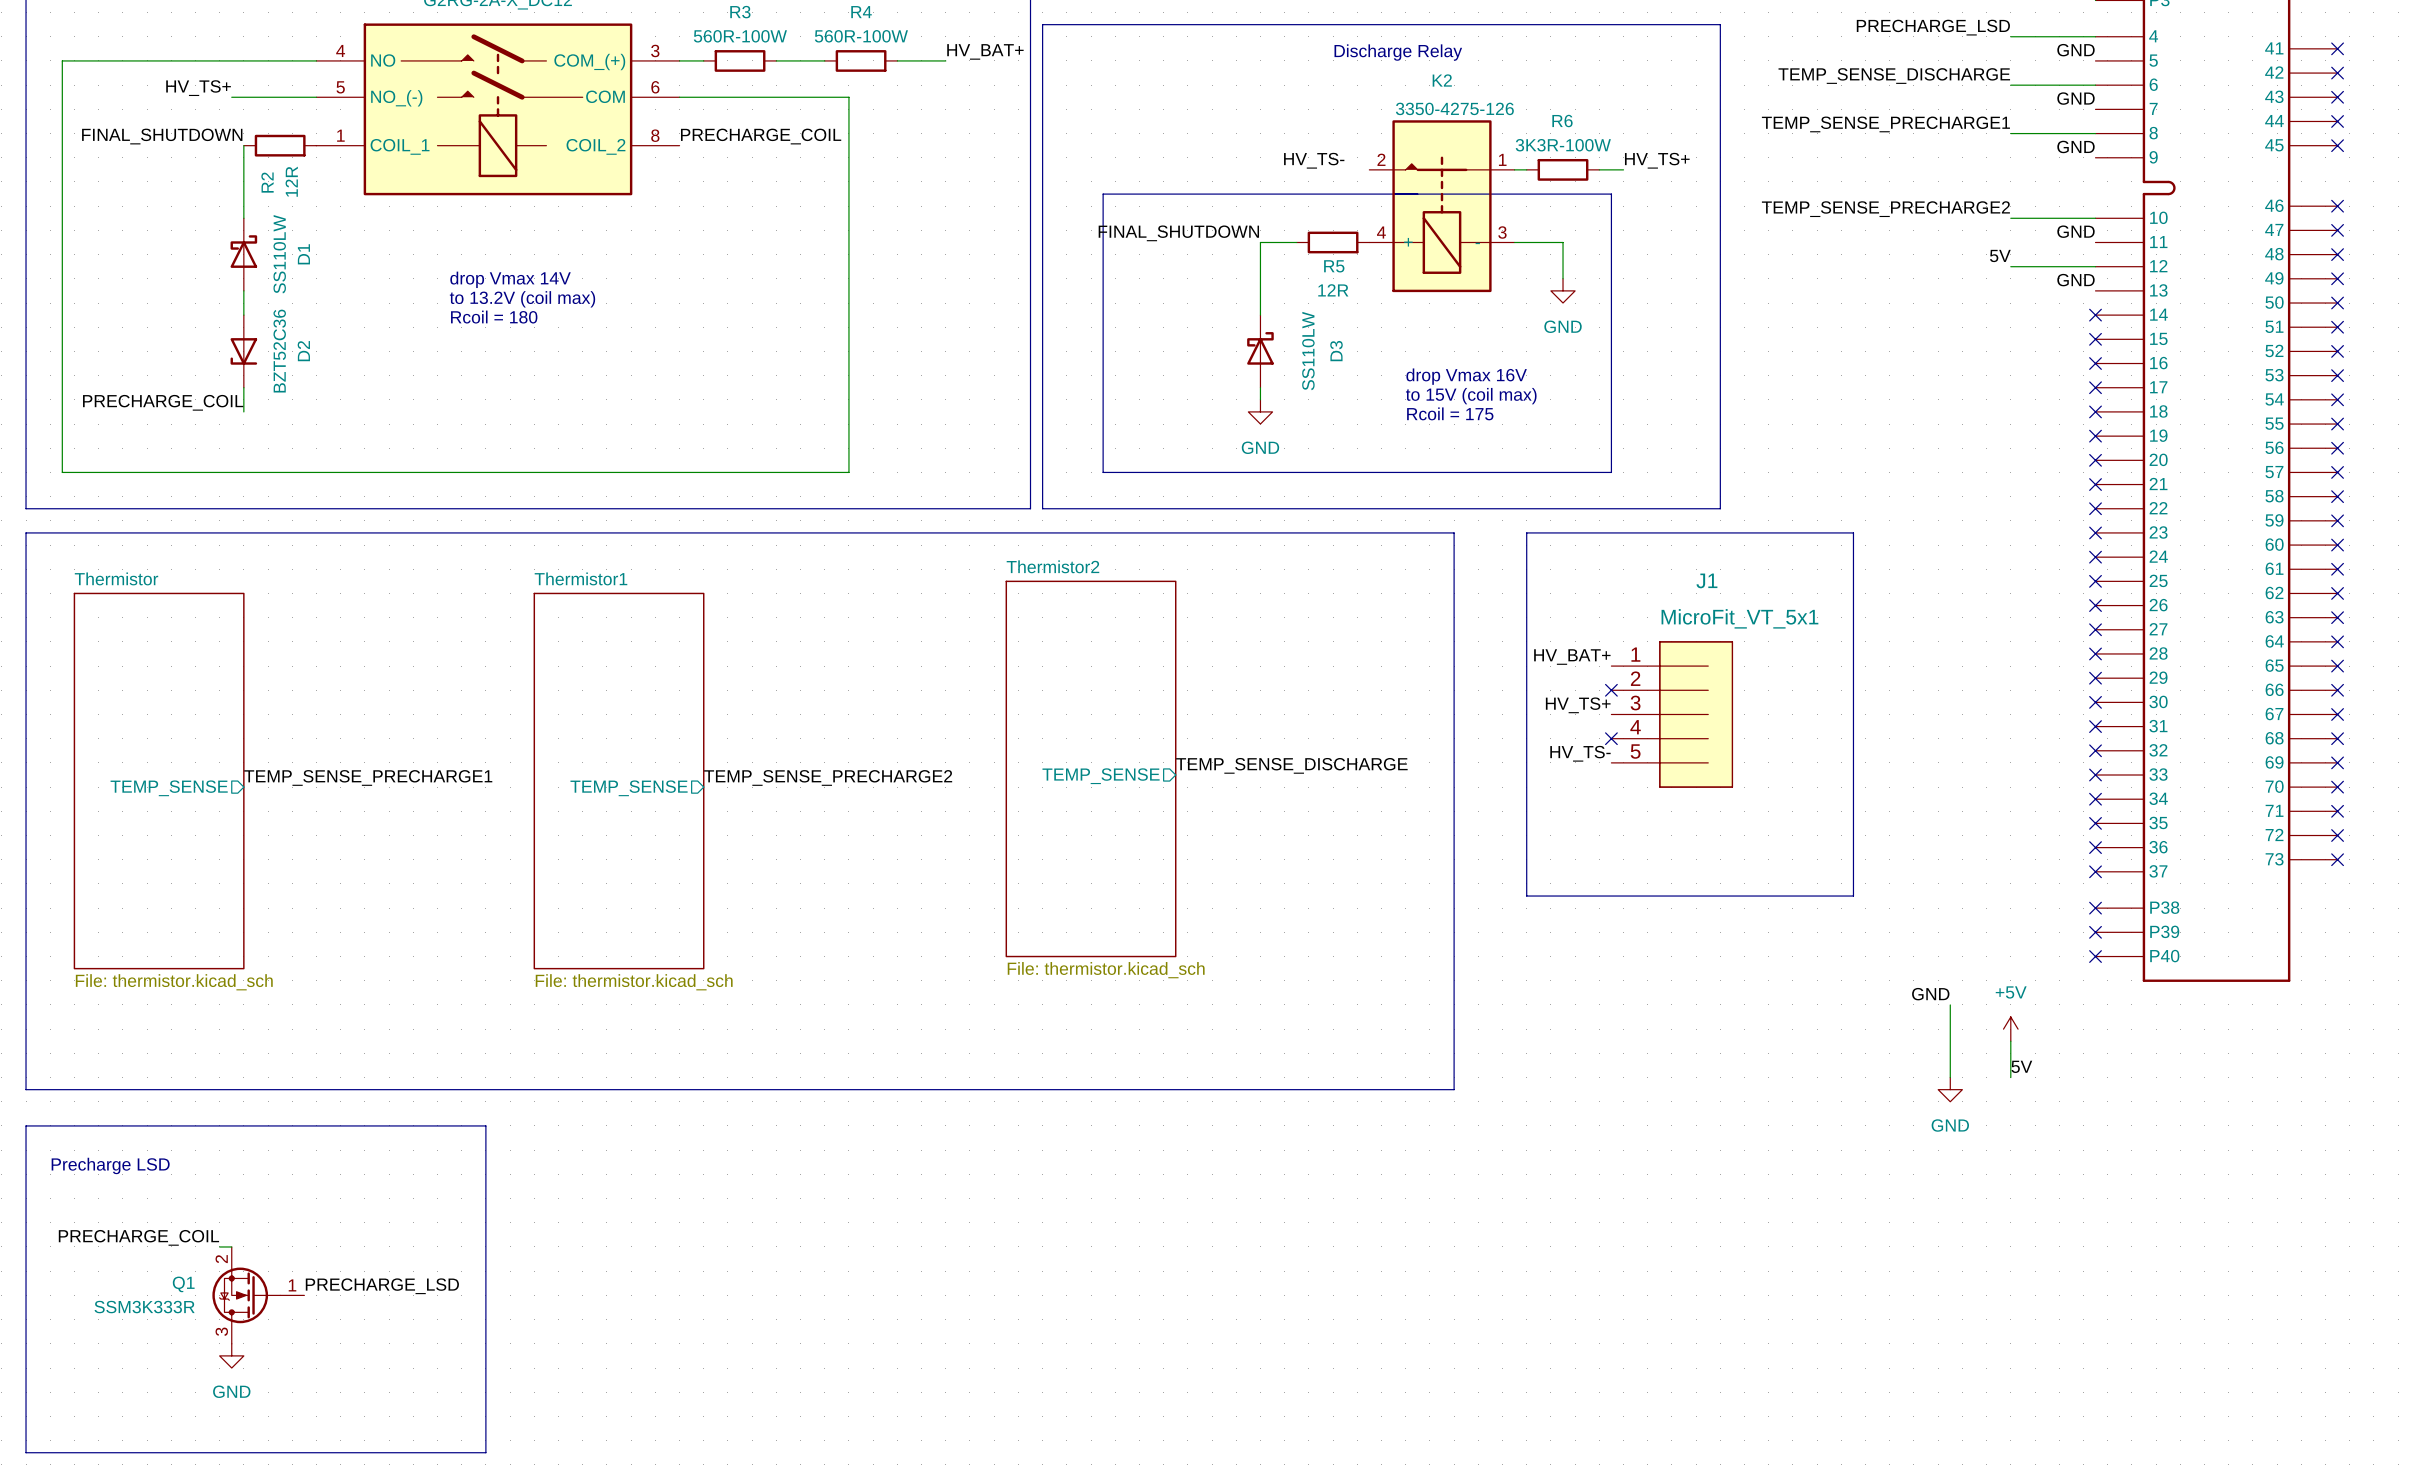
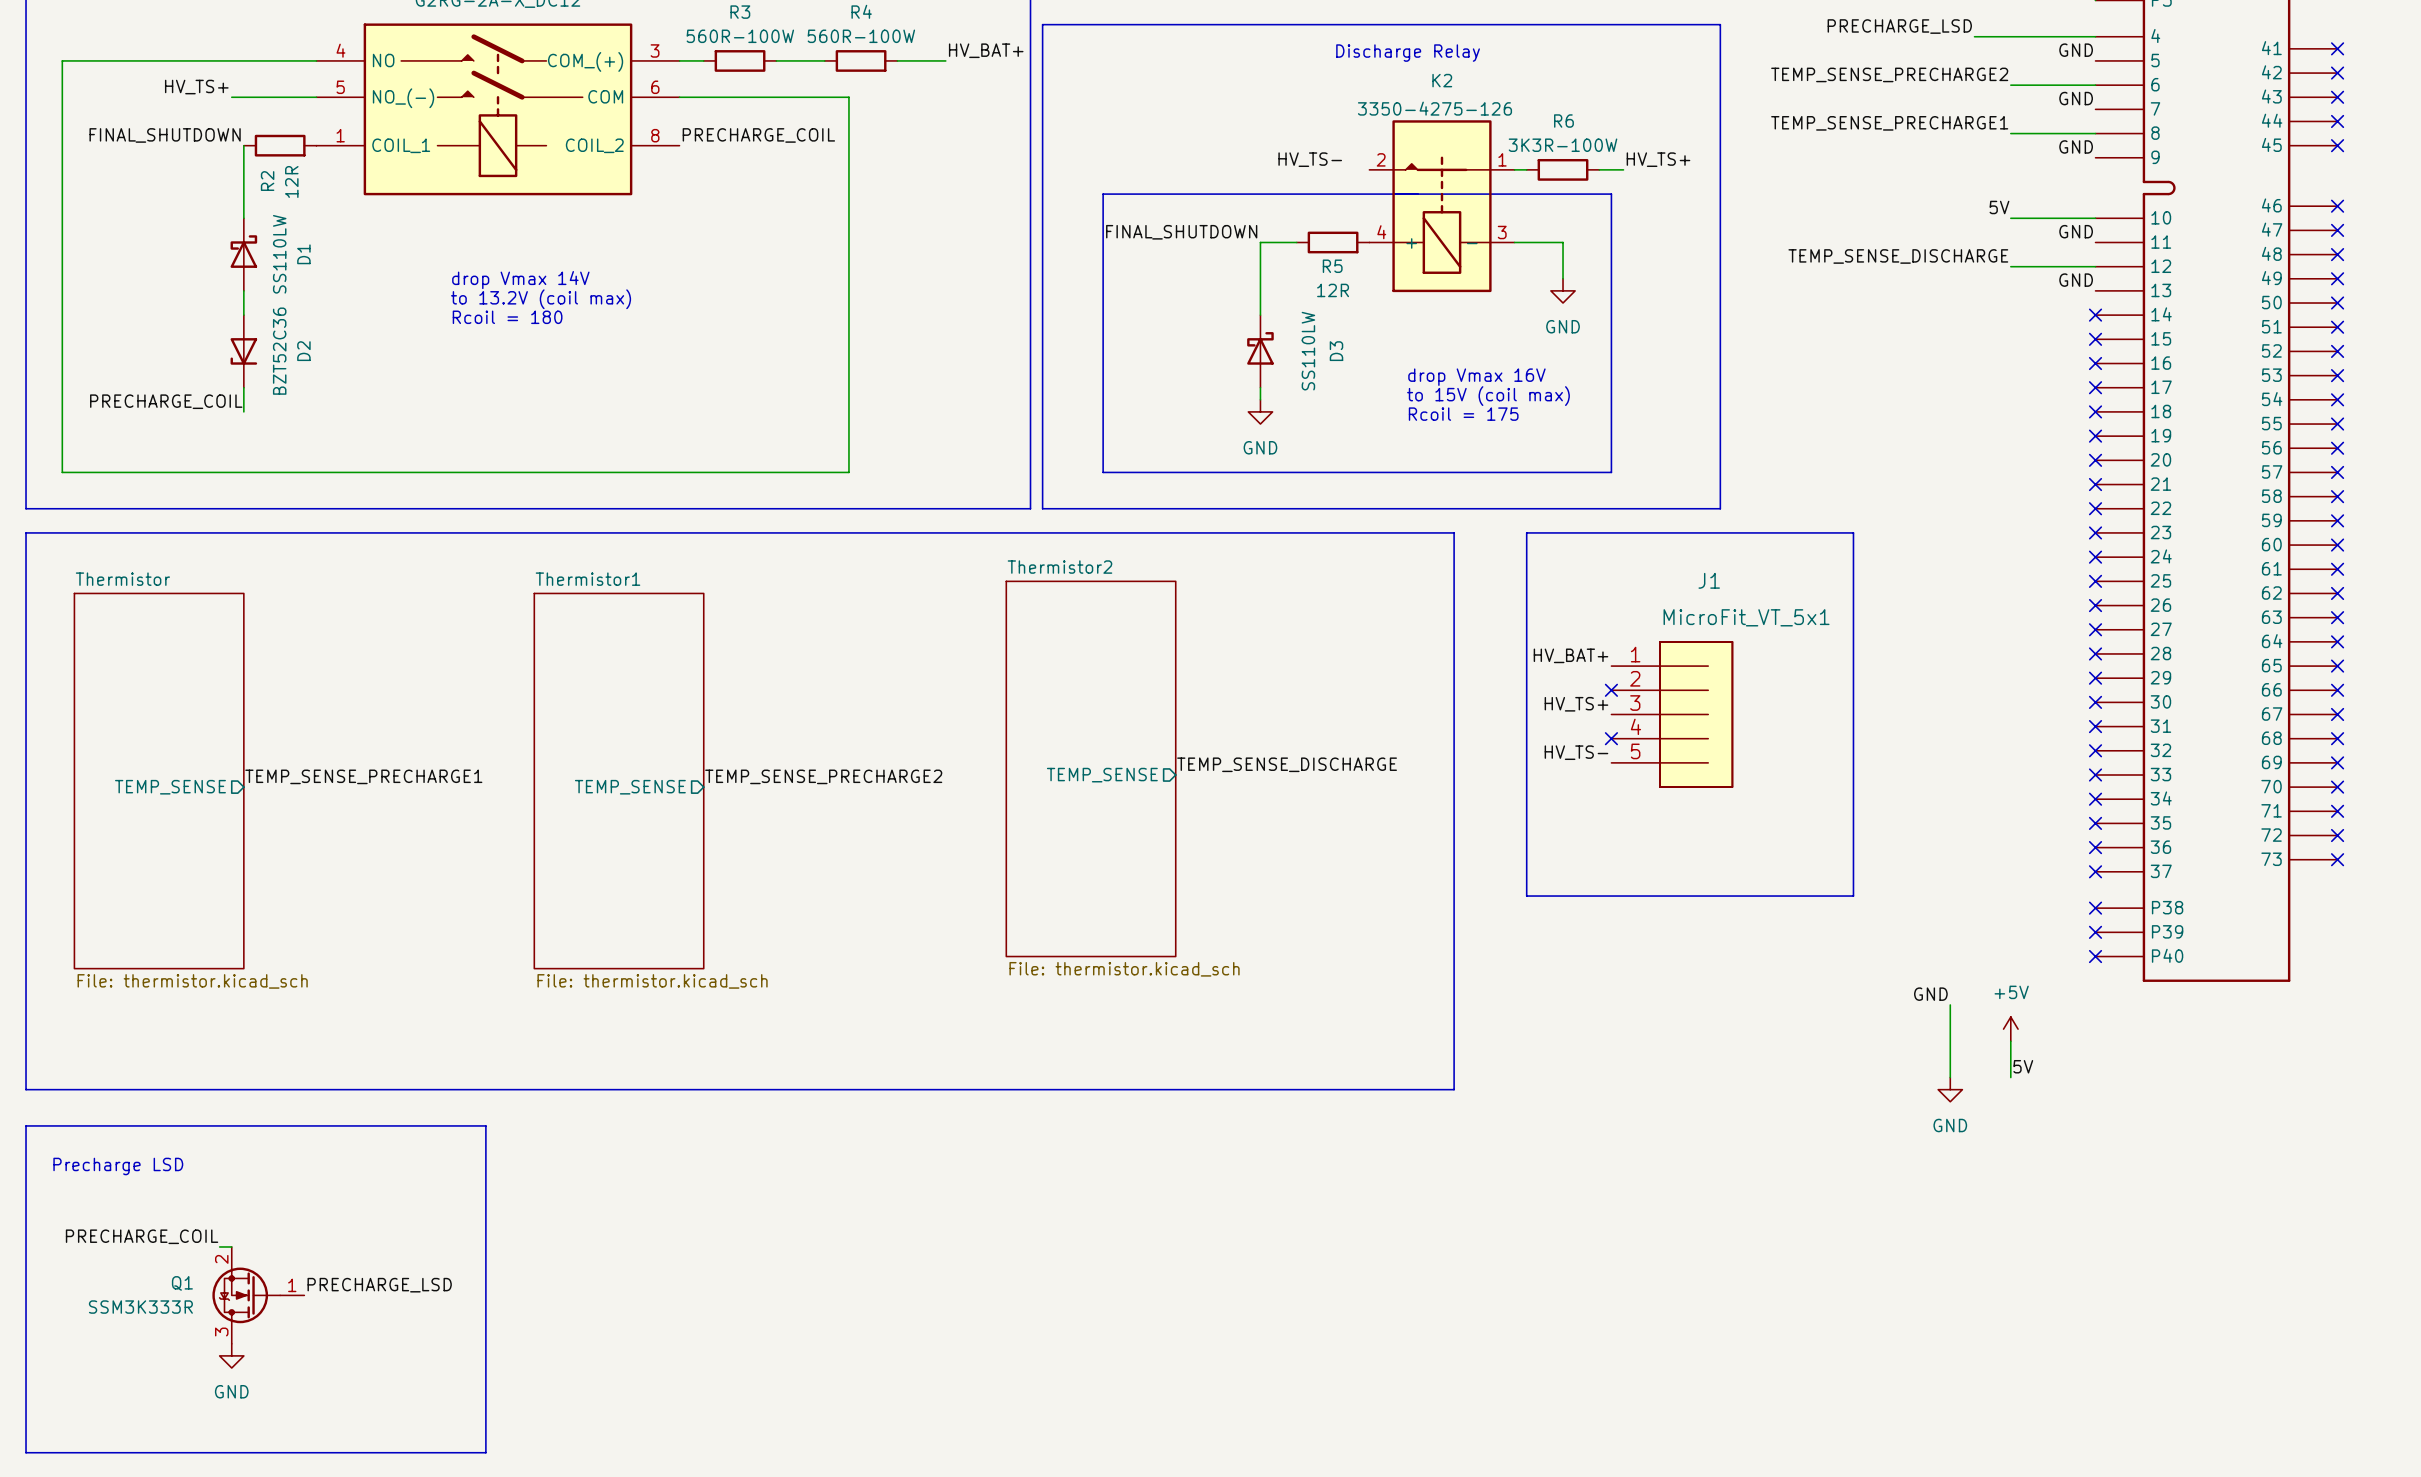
label position: PRECHARGE_LSD (1933, 27) -> PRECHARGE_LSD (1899, 26)
wire: none -> (1974, 36) (2010, 36)
label: TEMP_SENSE_DISCHARGE (1894, 76) -> TEMP_SENSE_PRECHARGE2 (1889, 74)
label: TEMP_SENSE_PRECHARGE2 (1885, 209) -> 5V (1999, 207)
label: 5V (2000, 255) -> TEMP_SENSE_DISCHARGE (1898, 256)

